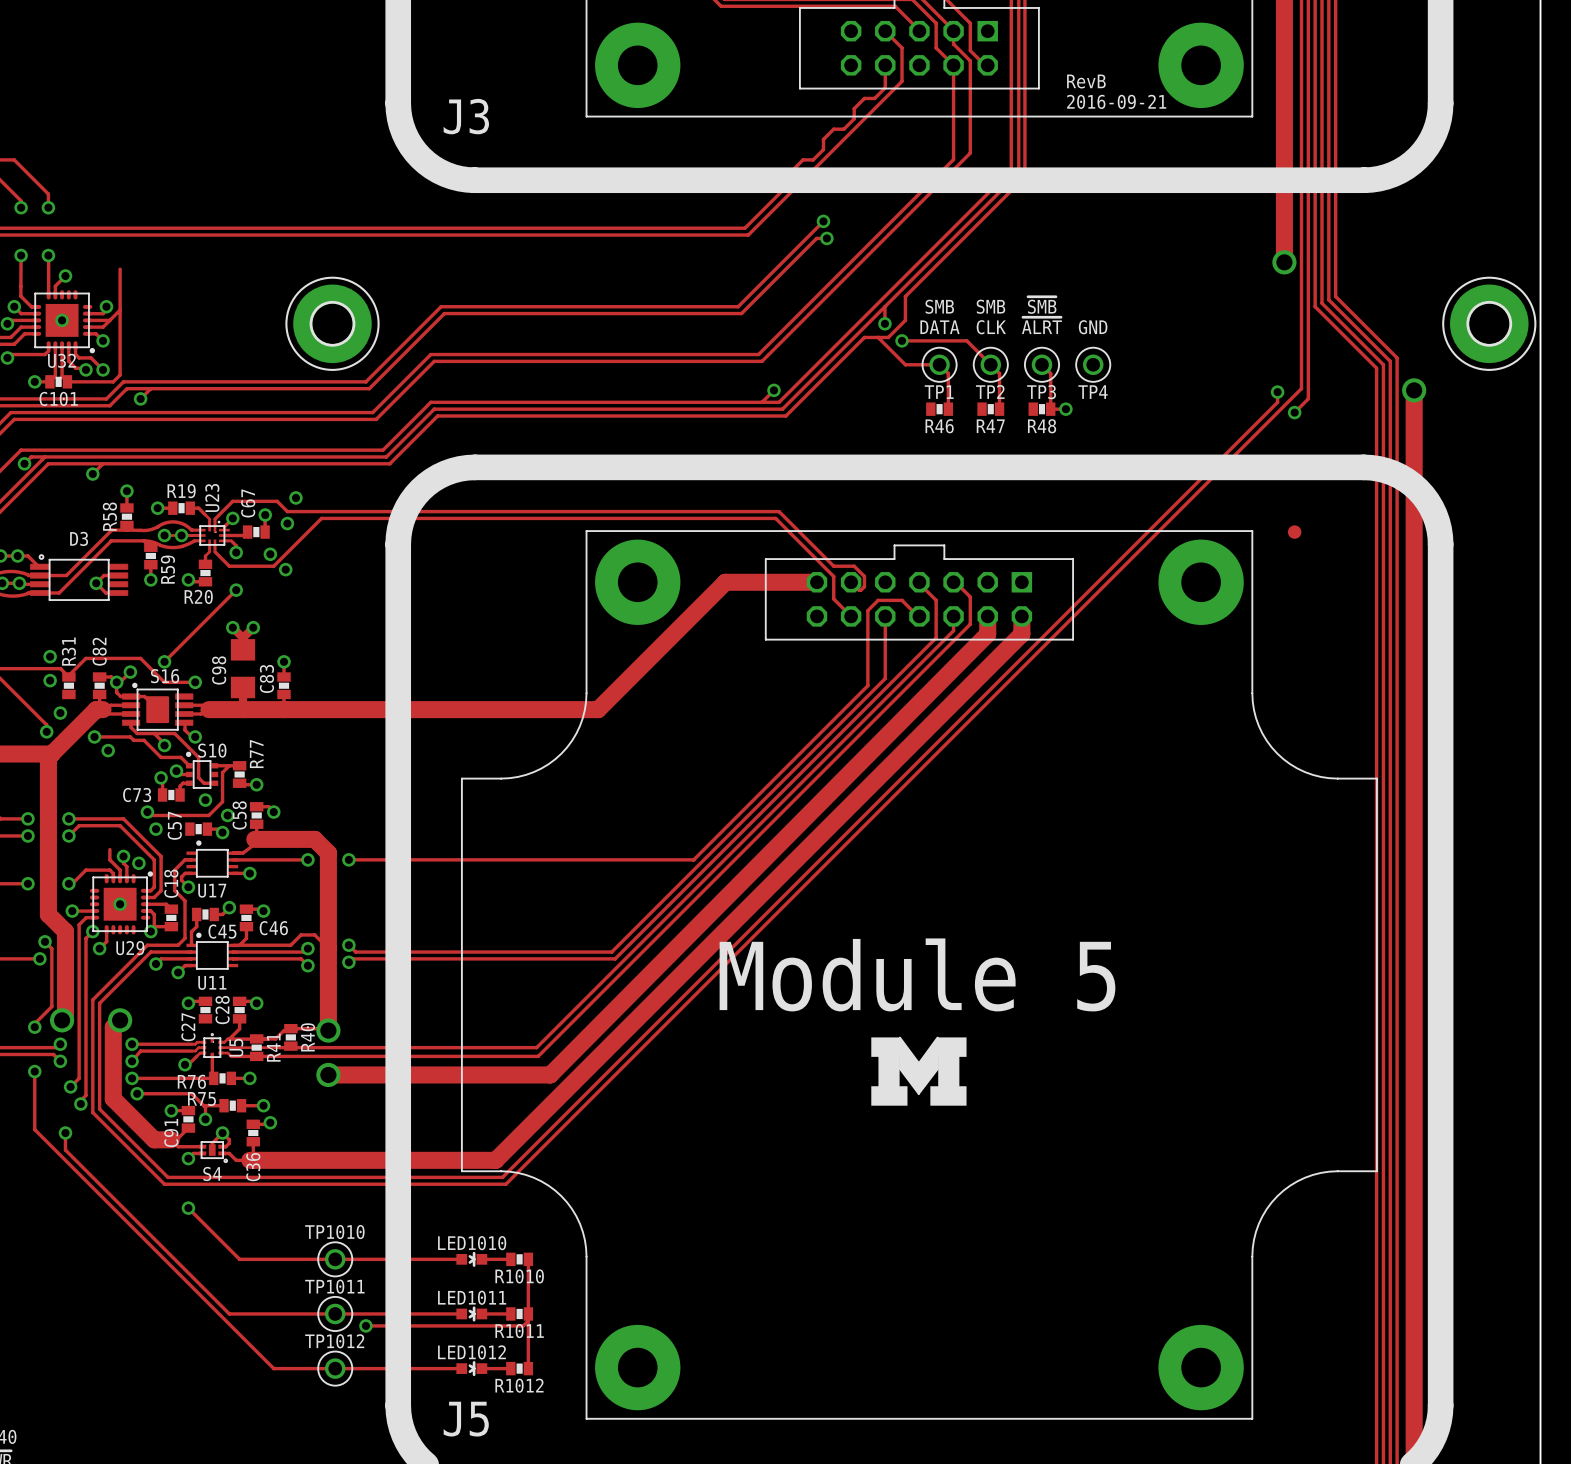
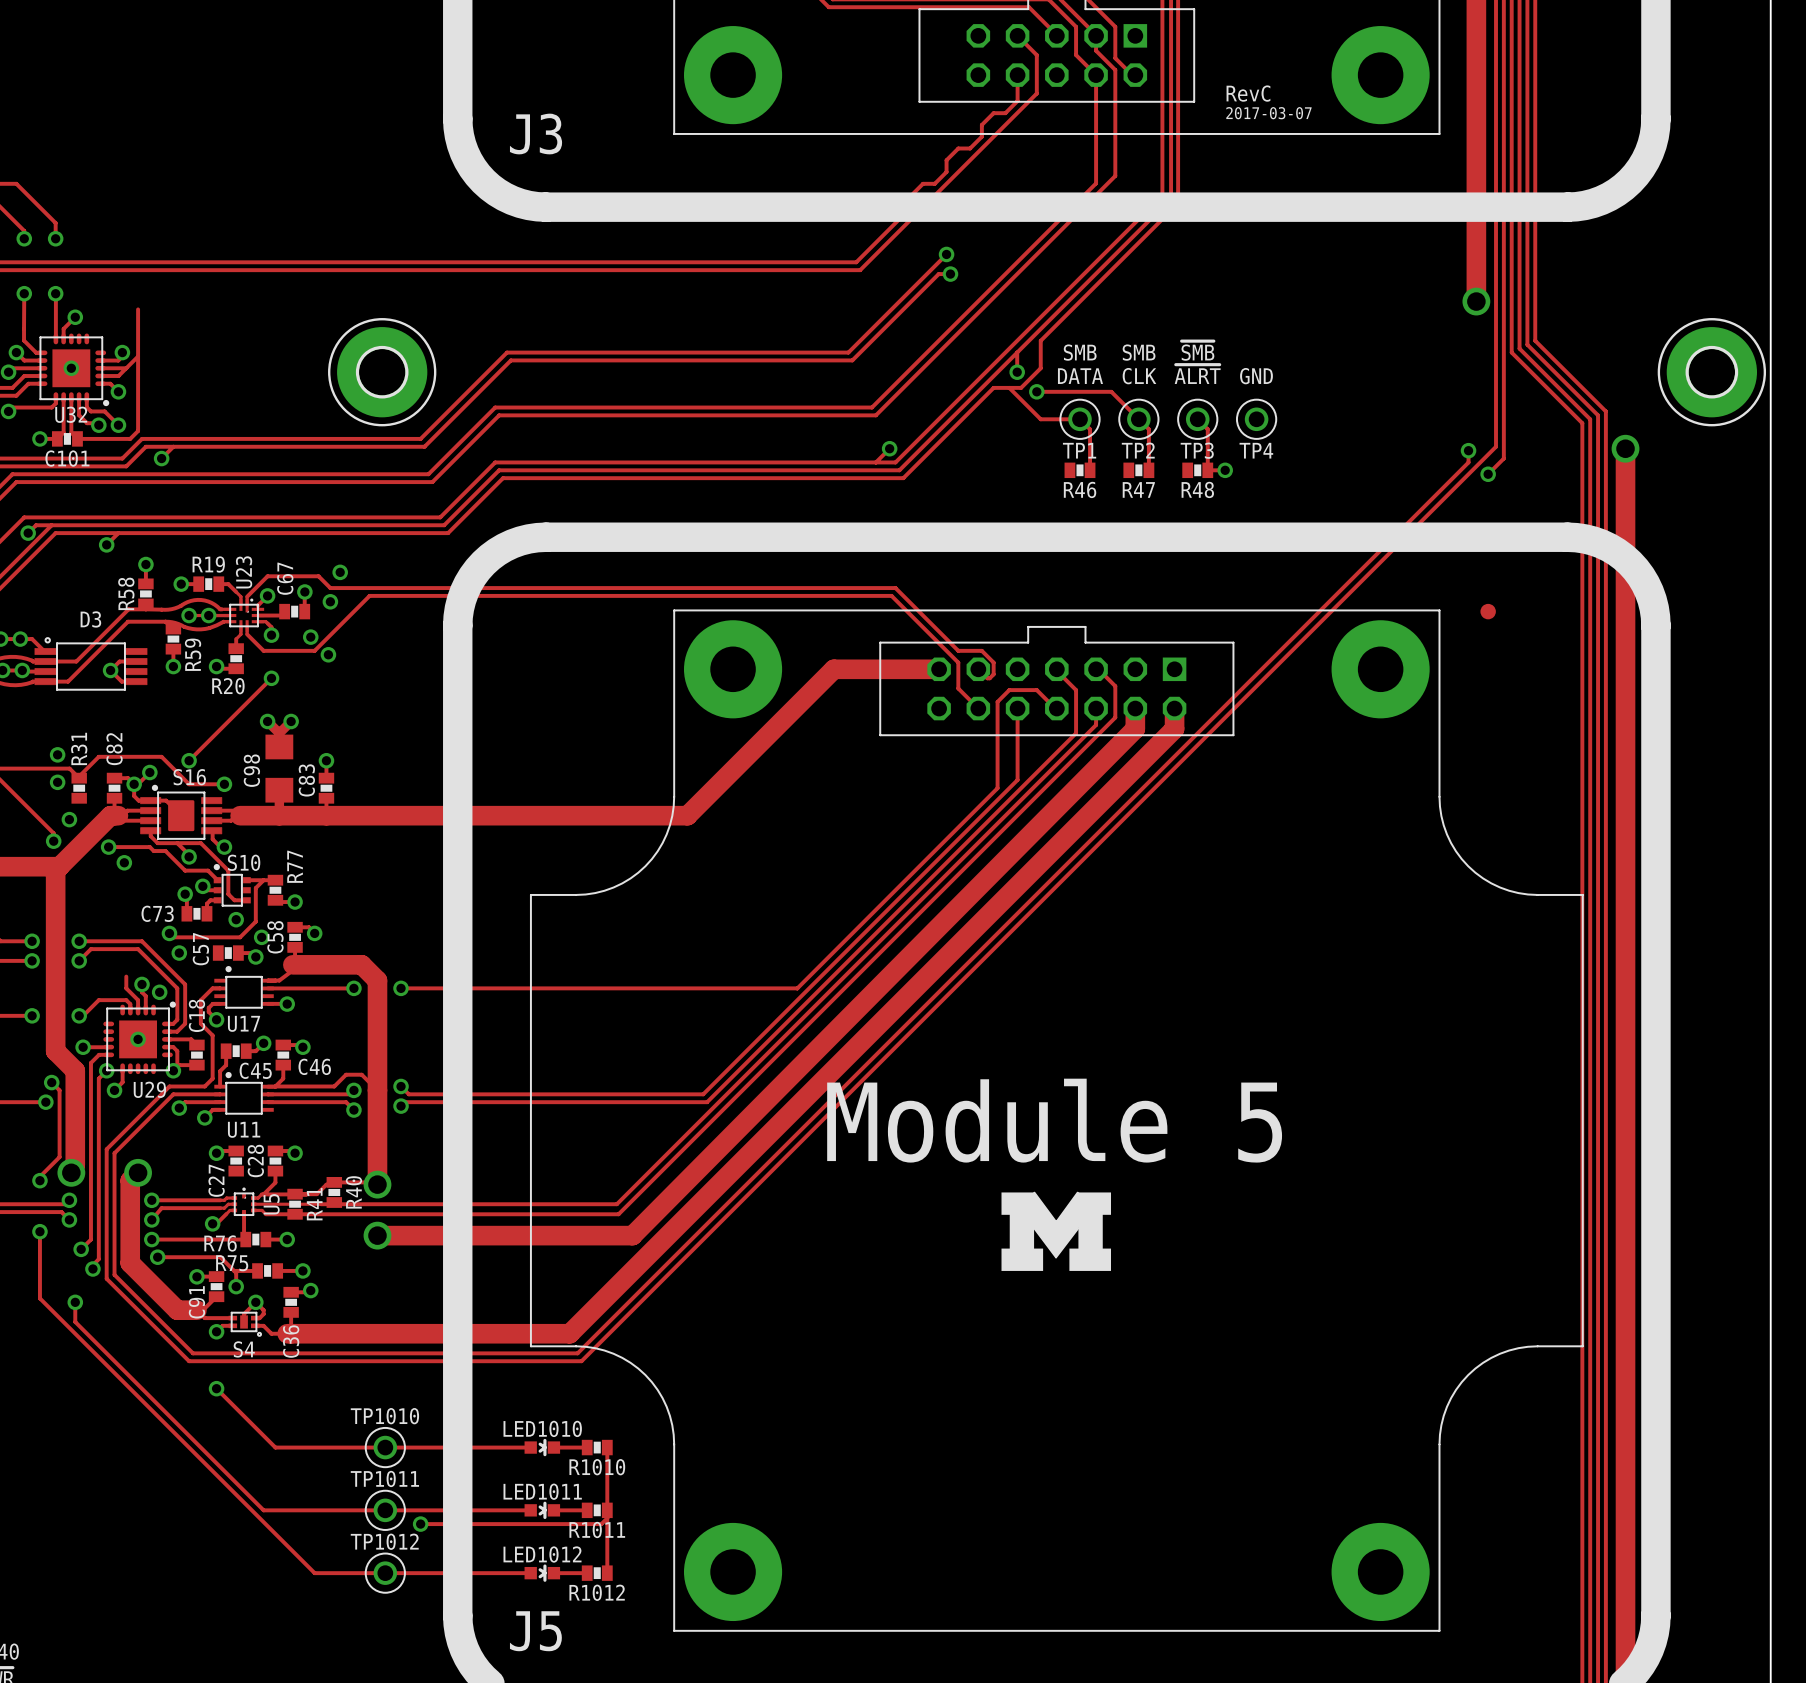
text: RevB (1086, 81) -> RevC (1248, 93)
text: 2016-09-21 (1116, 101) -> 2017-03-07 (1268, 113)

